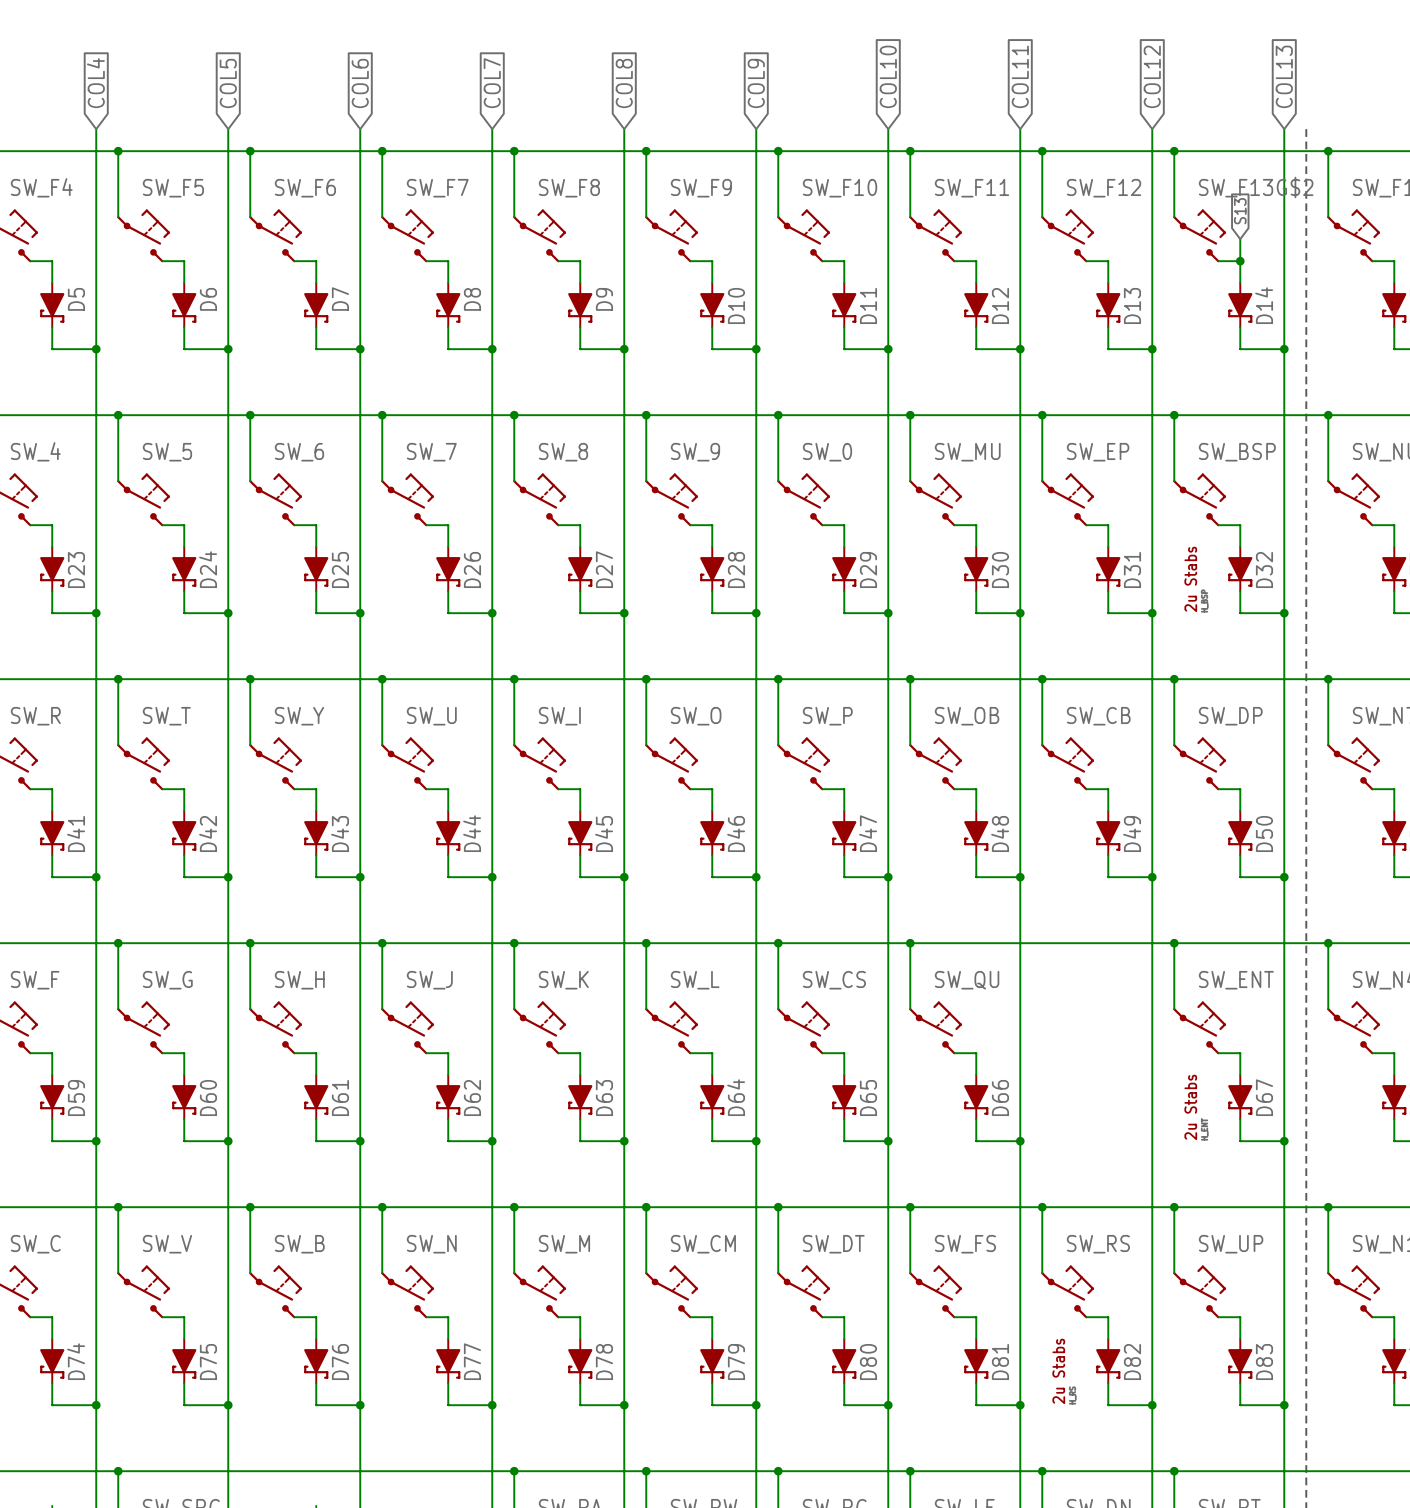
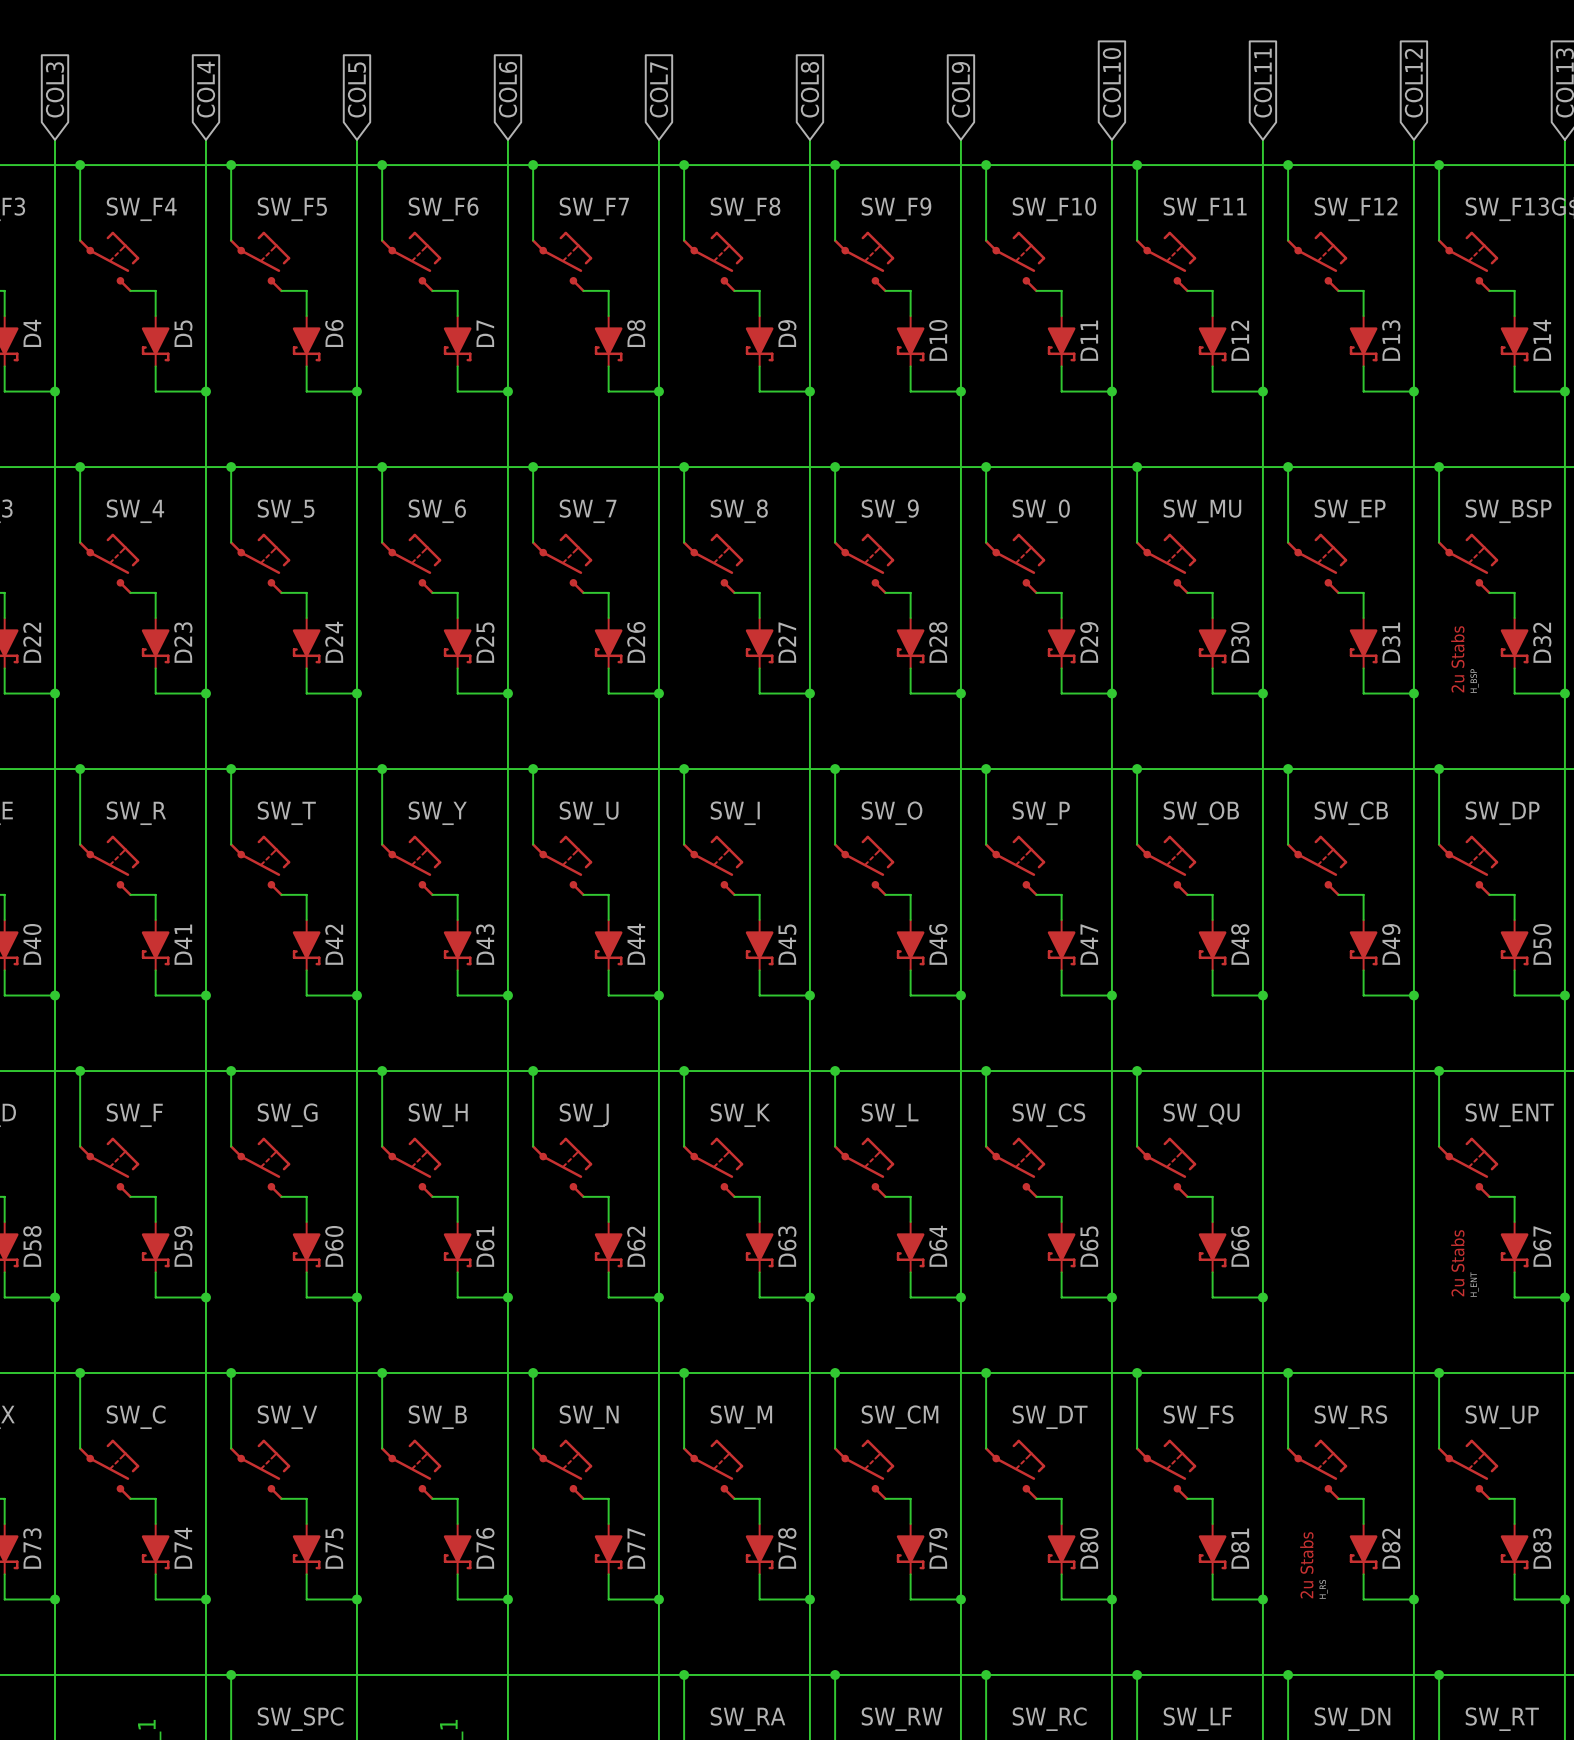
global label: S13 (1240, 211) -> none
wire: (1240, 239) (1240, 261) -> none
junction: (1240, 261) -> none

